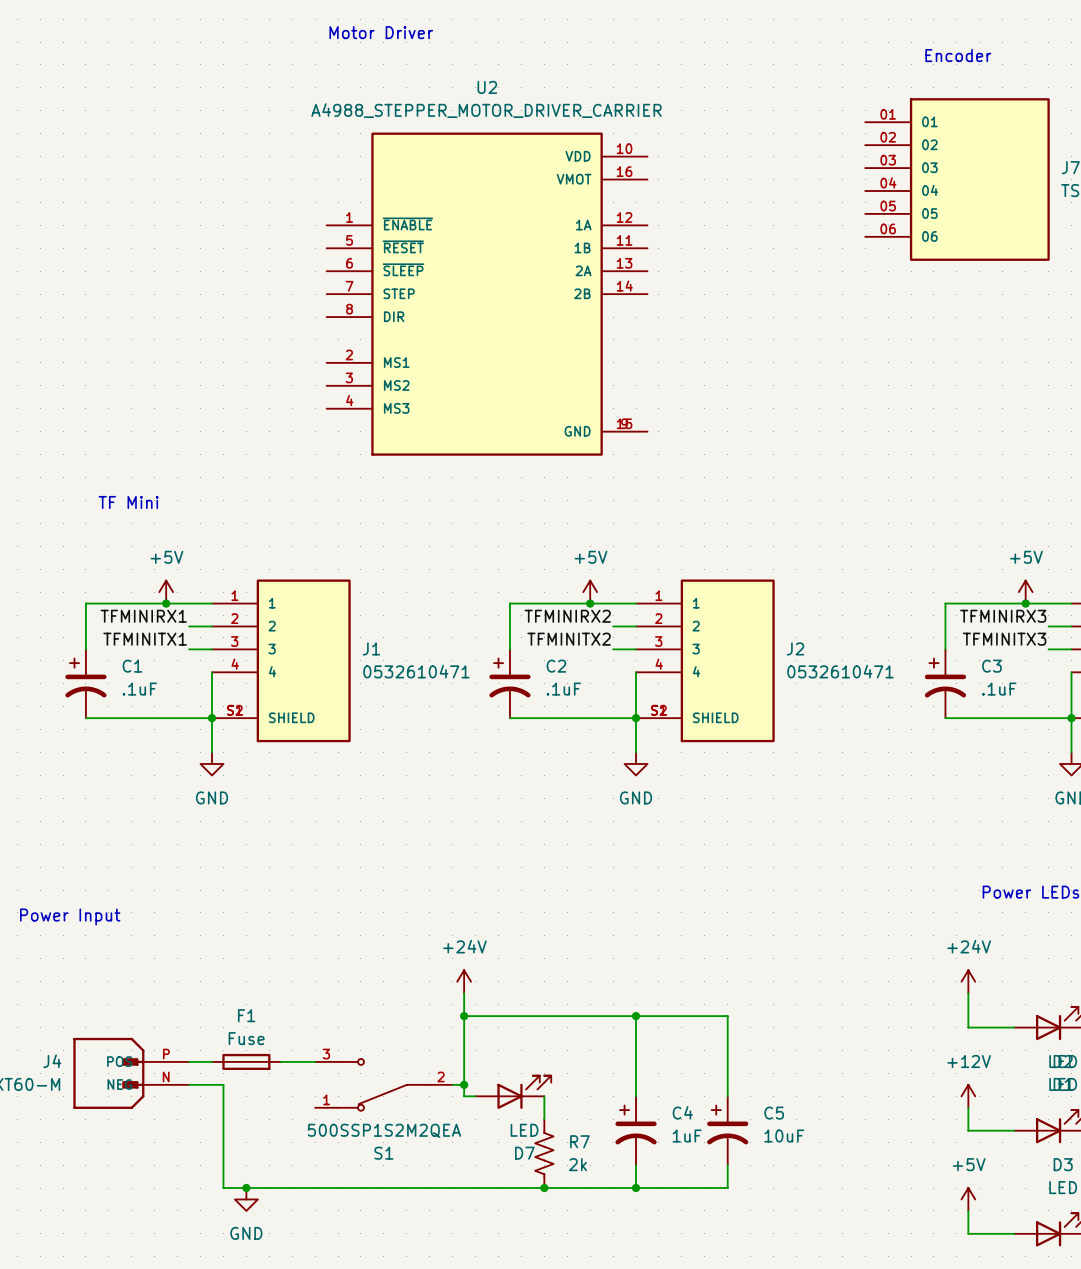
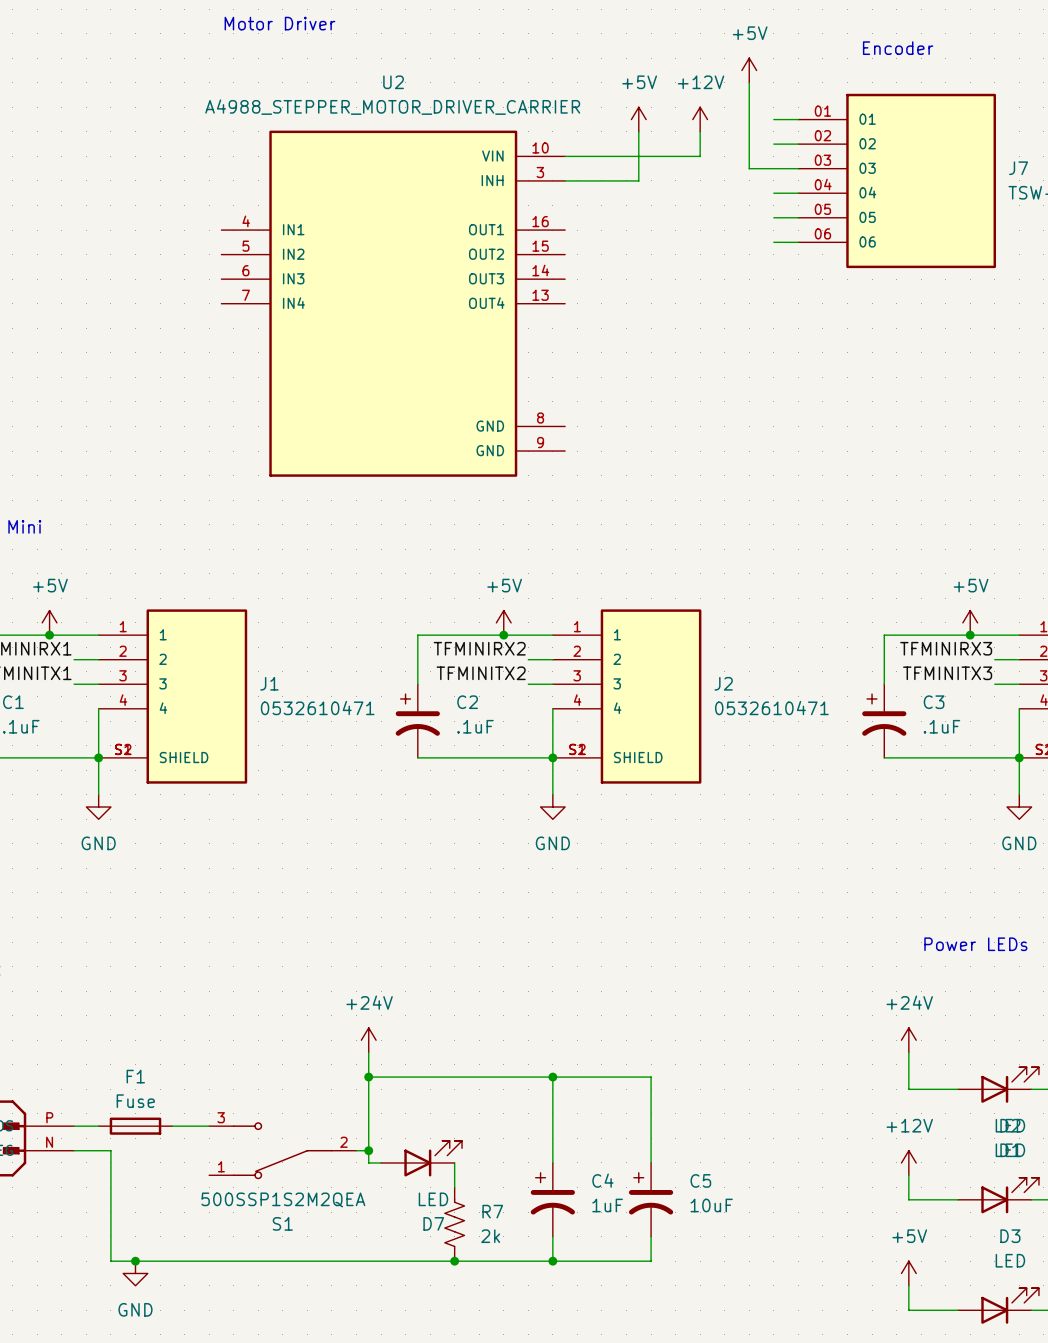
power symbol: none -> +5V (749, 70)
wire: none -> (749, 82) (749, 168) (798, 168)
power symbol: none -> +5V (638, 119)
power symbol: none -> +12V (700, 119)
wire: none -> (773, 119) (798, 119)
U2 symbol: [326, 132, 648, 456] -> [221, 130, 566, 477]
wire: none -> (638, 131) (638, 180) (565, 180)
wire: none -> (700, 131) (700, 156) (565, 156)
wire: none -> (773, 144) (798, 144)
wire: none -> (773, 193) (798, 193)
wire: none -> (773, 217) (798, 217)
wire: none -> (773, 242) (798, 242)

